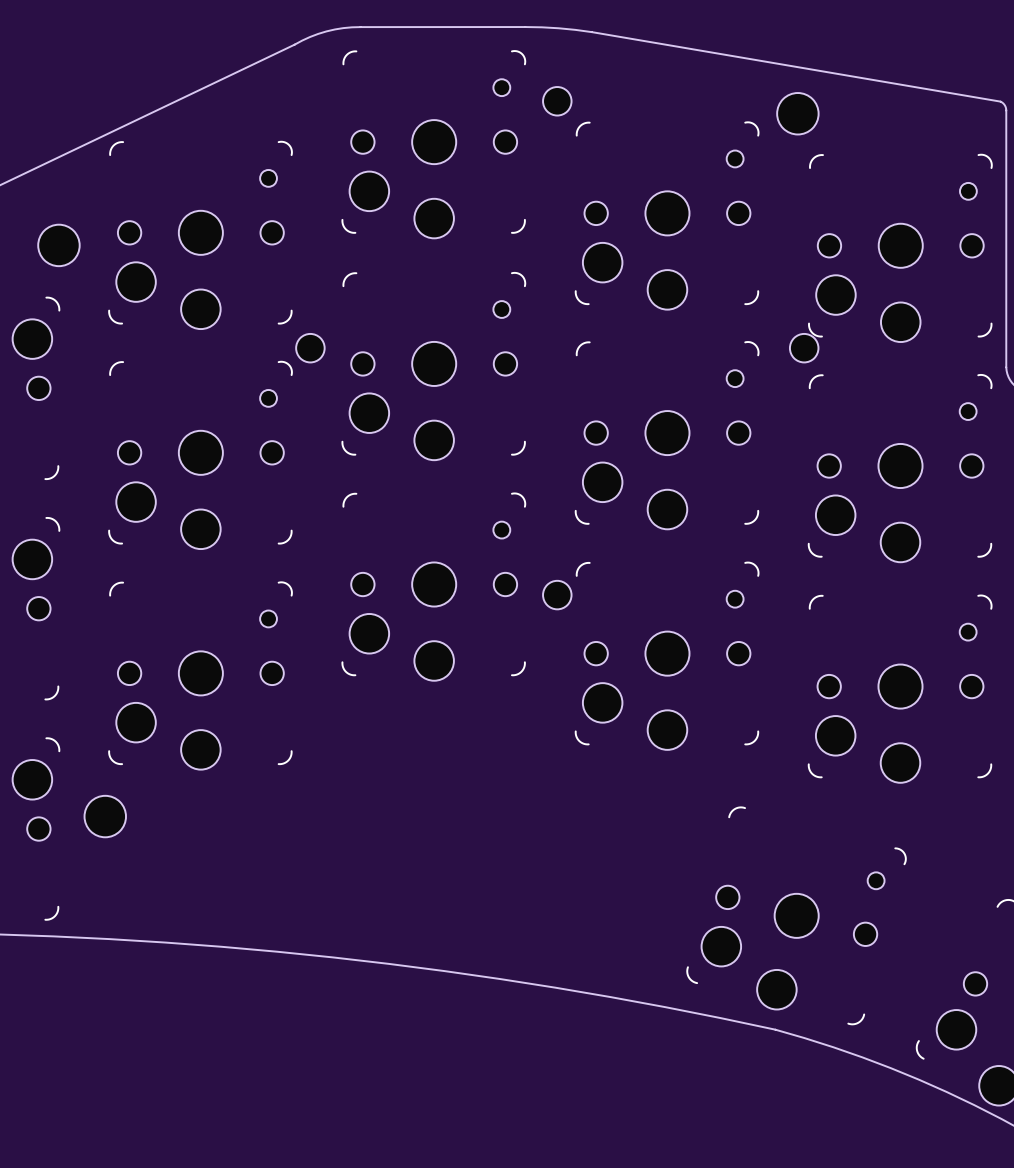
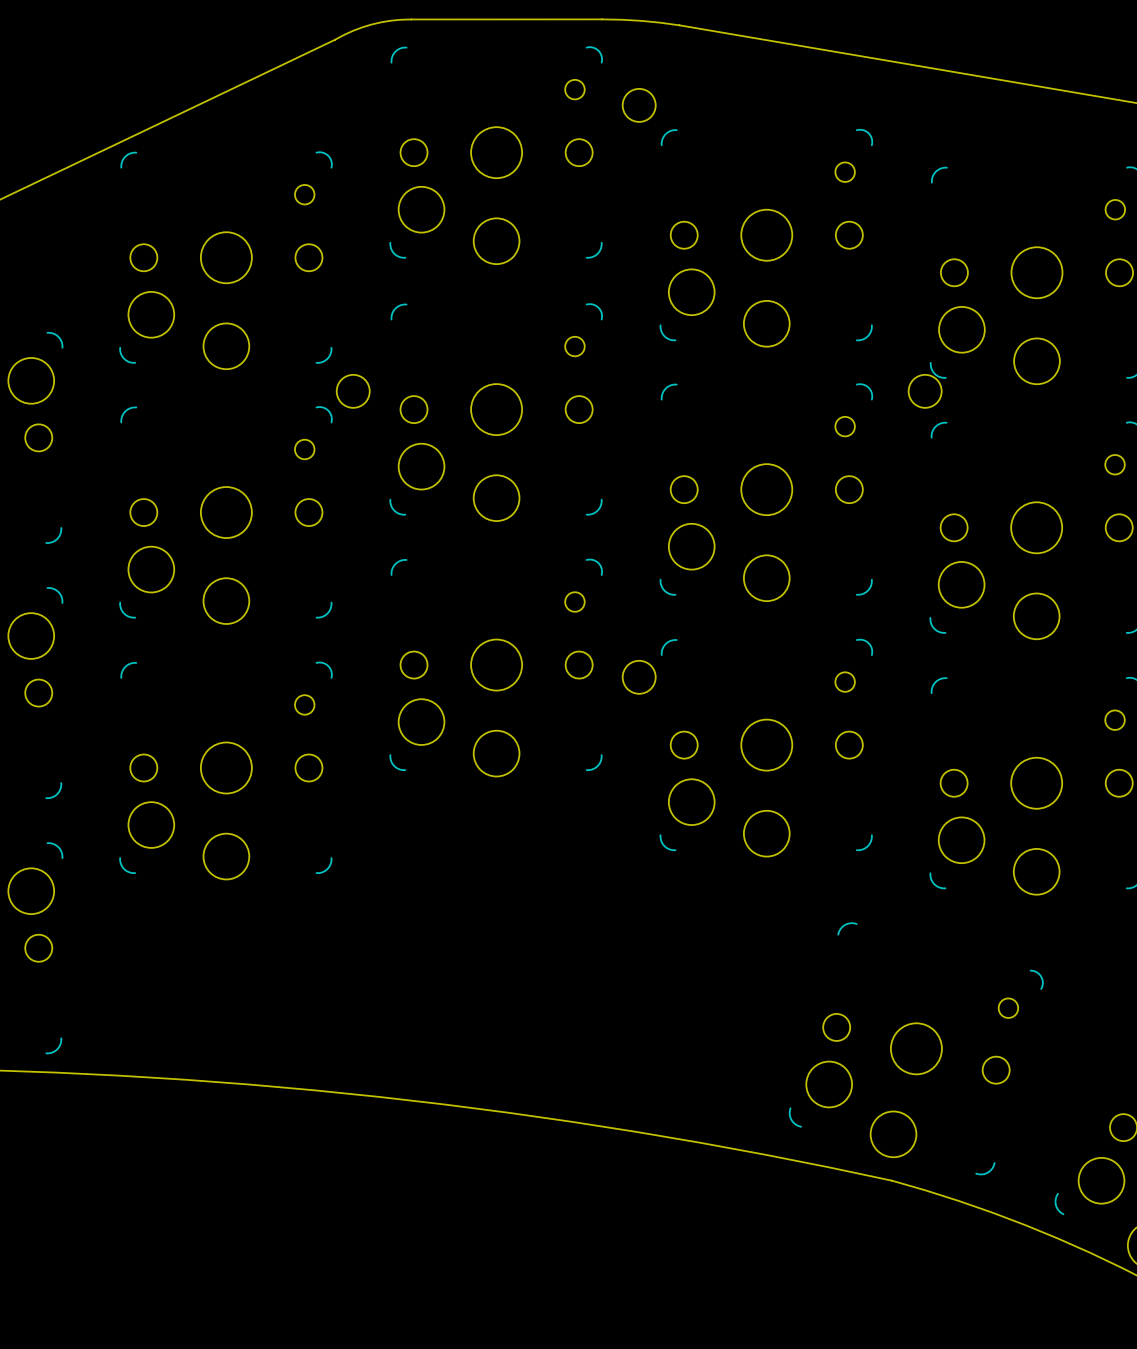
part: (797, 113) -> none
part: (58, 245) -> none
part: (105, 816) -> none

